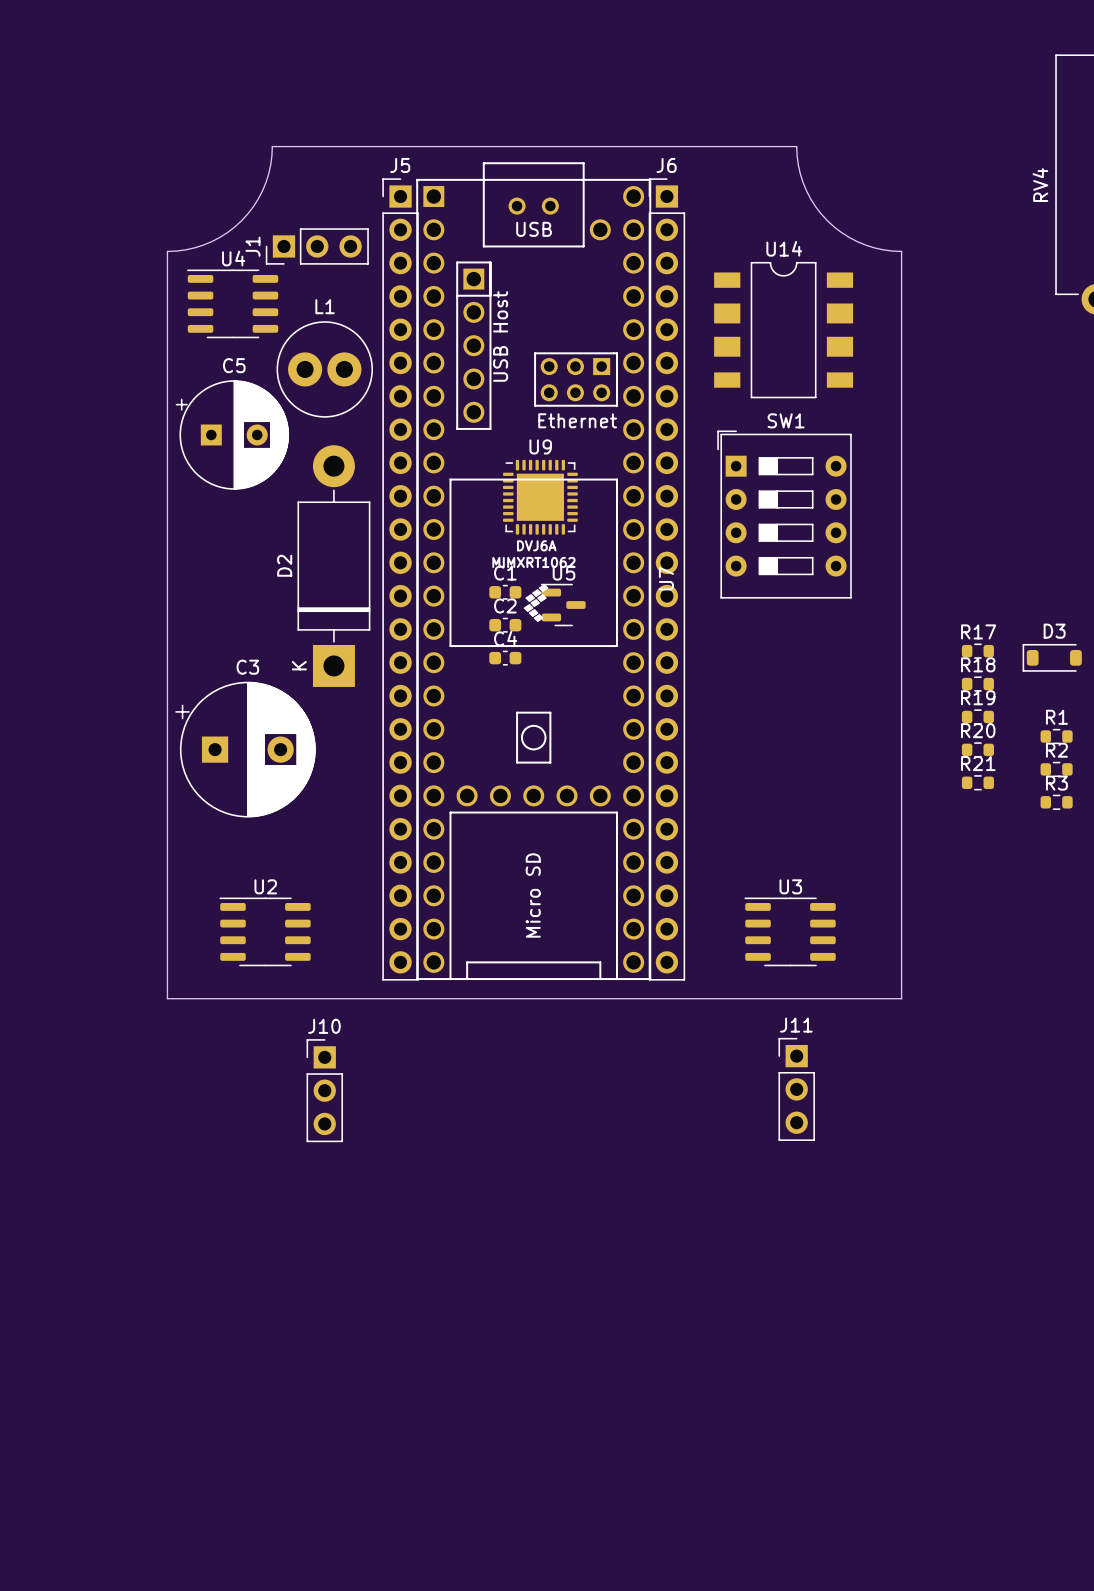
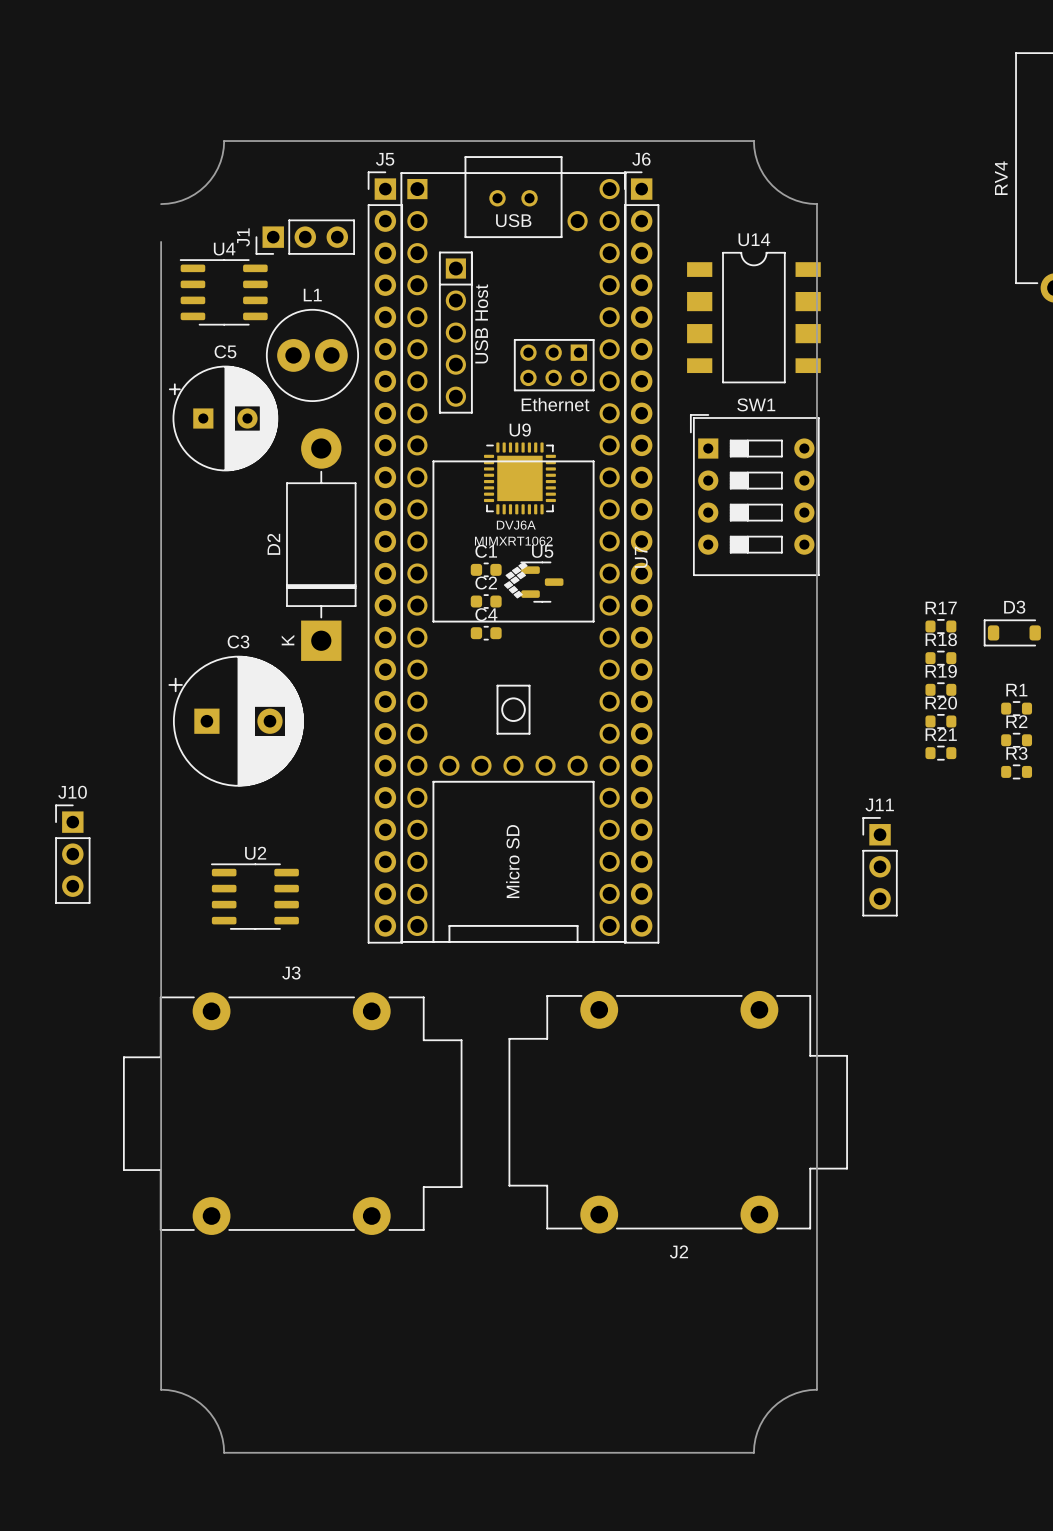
board edge: (272, 146) (268, 173) (262, 190) (253, 206) (241, 220) (227, 232) (211, 241) (185, 249) (167, 251) -> (262, 141) (224, 141) (220, 161) (214, 174) (205, 185) (194, 194) (181, 200) (161, 204)
board edge: (783, 146) (796, 146) (800, 173) (806, 190) (821, 213) (834, 226) (849, 237) (865, 245) (883, 249) (901, 251) (901, 998) (167, 998) -> (753, 141) (755, 155) (760, 168) (772, 185) (783, 194) (796, 200) (816, 204) (816, 1389) (802, 1391) (789, 1395) (772, 1408) (760, 1425) (755, 1438) (753, 1452) (224, 1452) (220, 1431) (214, 1419) (205, 1408) (188, 1395) (175, 1391) (161, 1389) (161, 960)
U3: (790, 931) -> none
J11 position: (796, 1089) -> (880, 866)
J10 position: (324, 1090) -> (72, 854)
J2: none -> (678, 1112)
J3: none -> (292, 1113)

